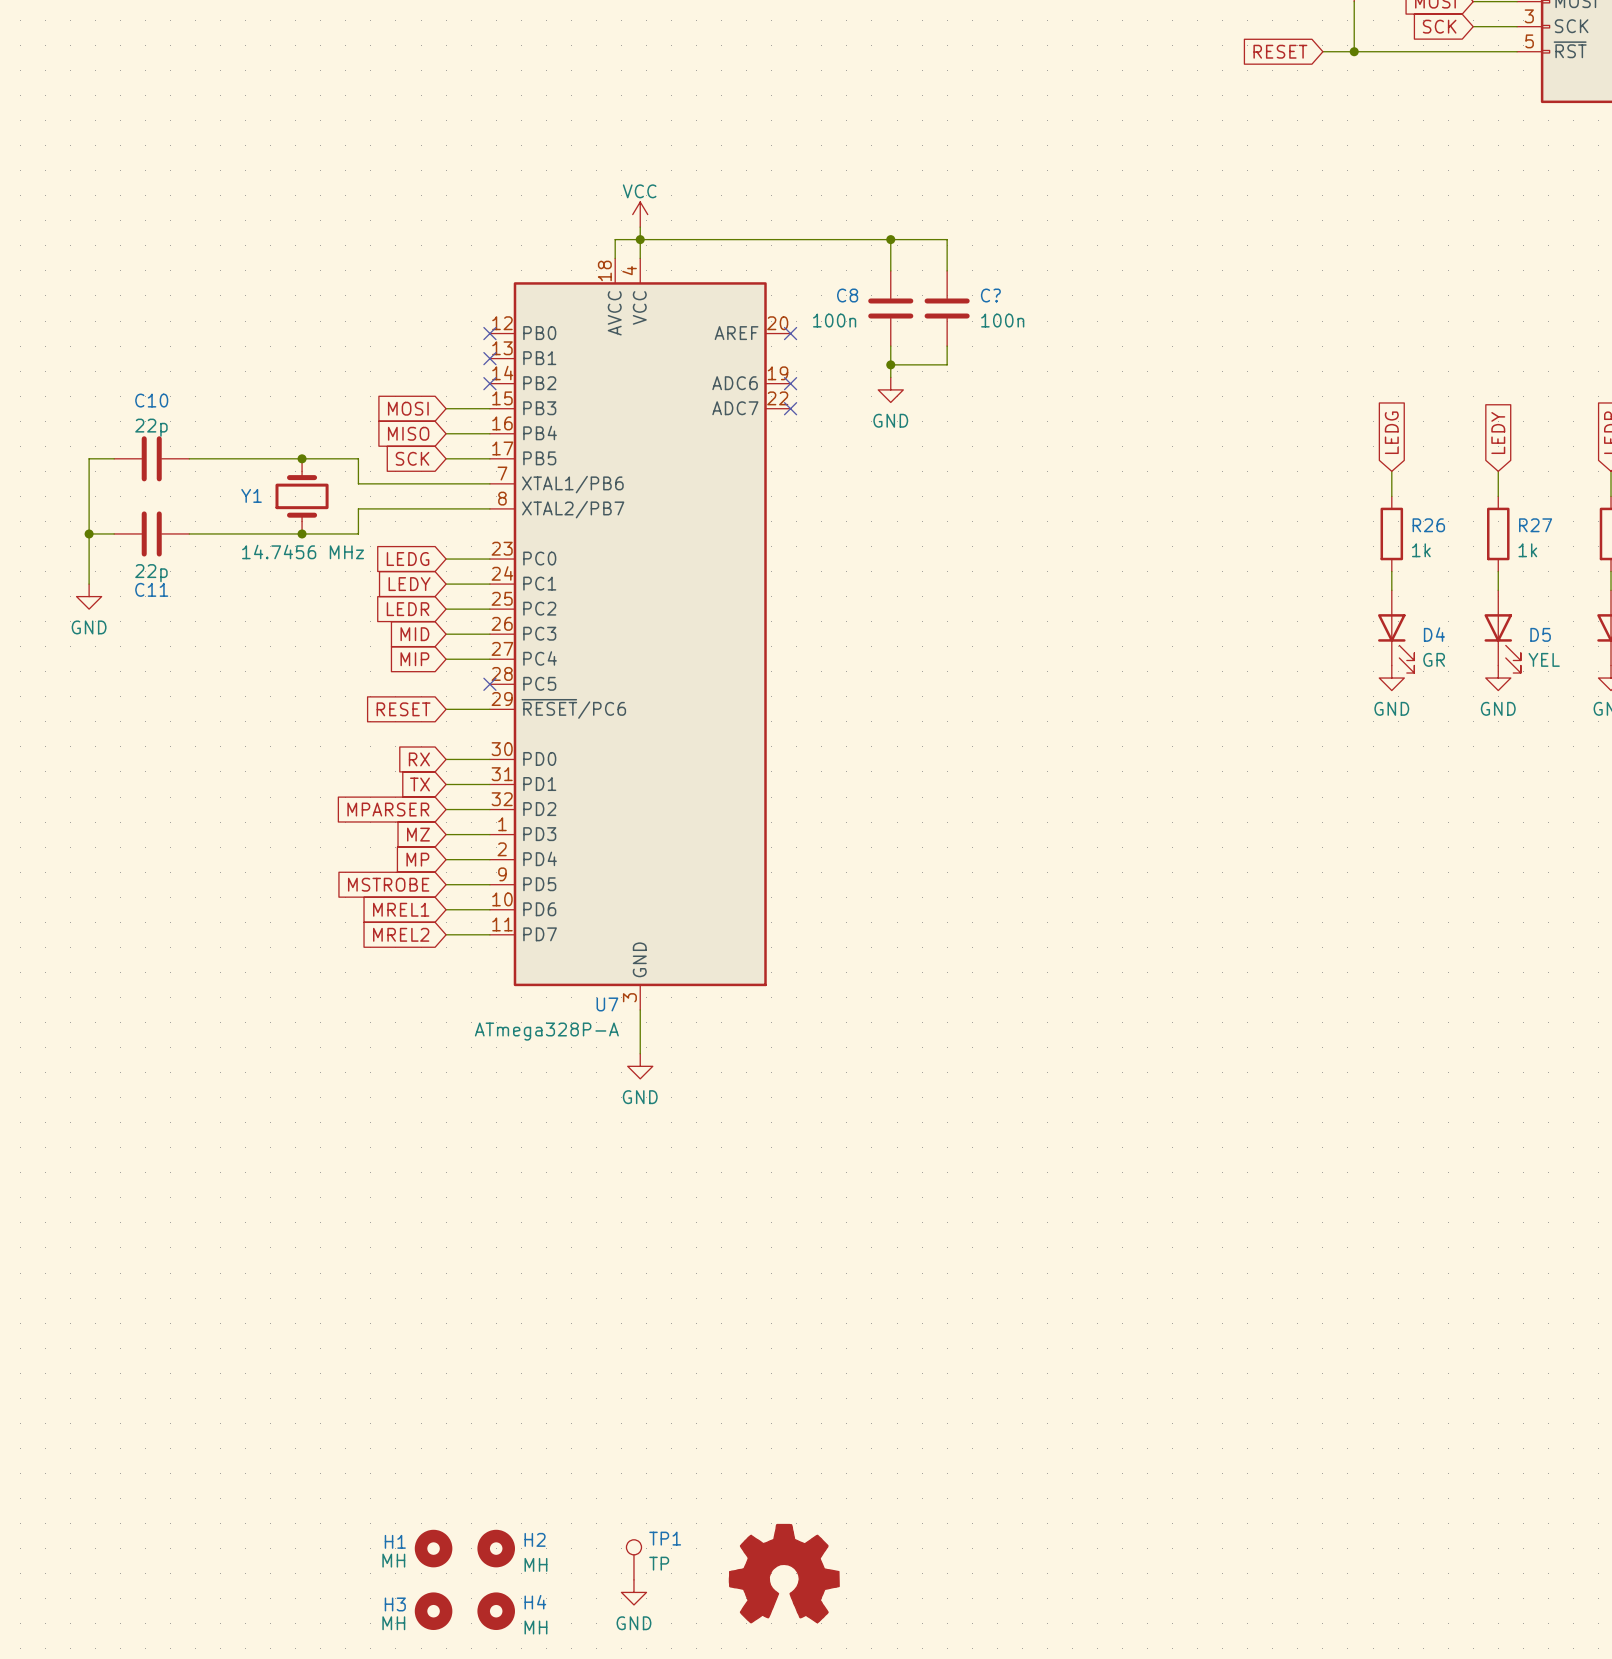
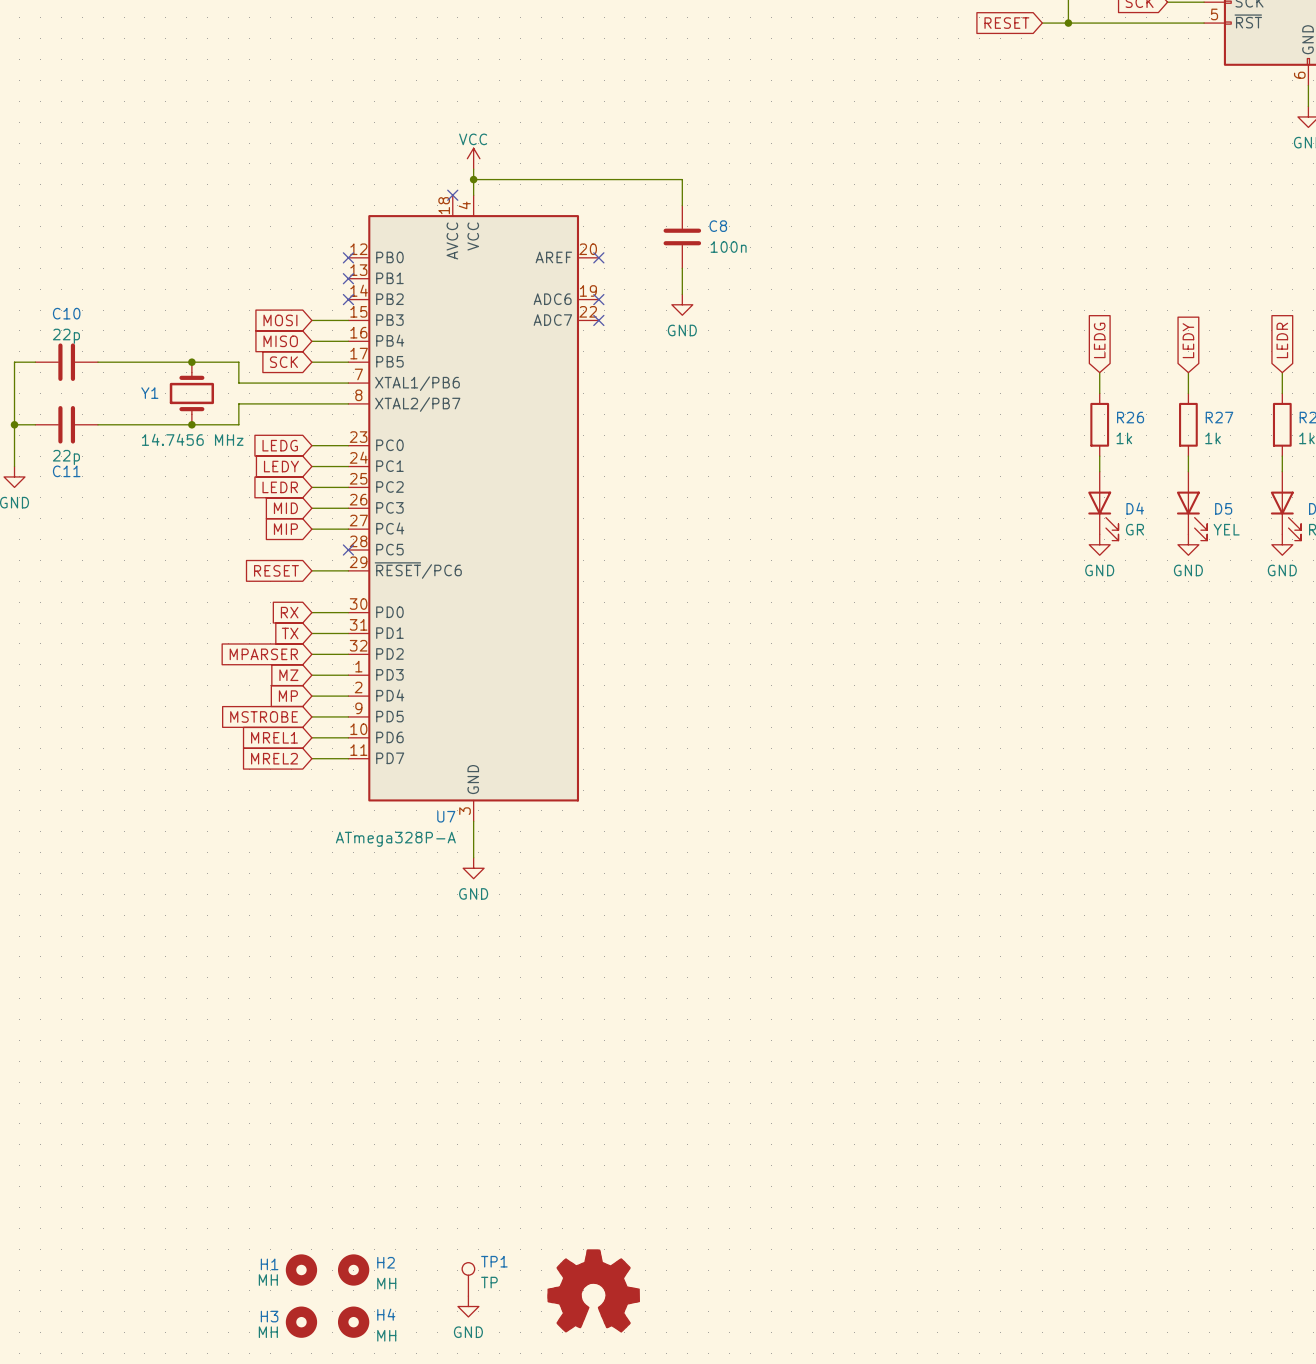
wire: (640, 239) (615, 239) (615, 258) -> none
wire: (890, 239) (947, 239) (947, 270) -> none
junction: (890, 239) -> none
no-connect mark: none -> (452, 195)
C8 name position: C8 (847, 295) -> C8 (718, 226)
C?: 100n (947, 308) -> none
C8 value position: 100n (834, 320) -> 100n (728, 247)
wire: (947, 346) (947, 364) (890, 364) -> none
junction: (890, 364) -> none

